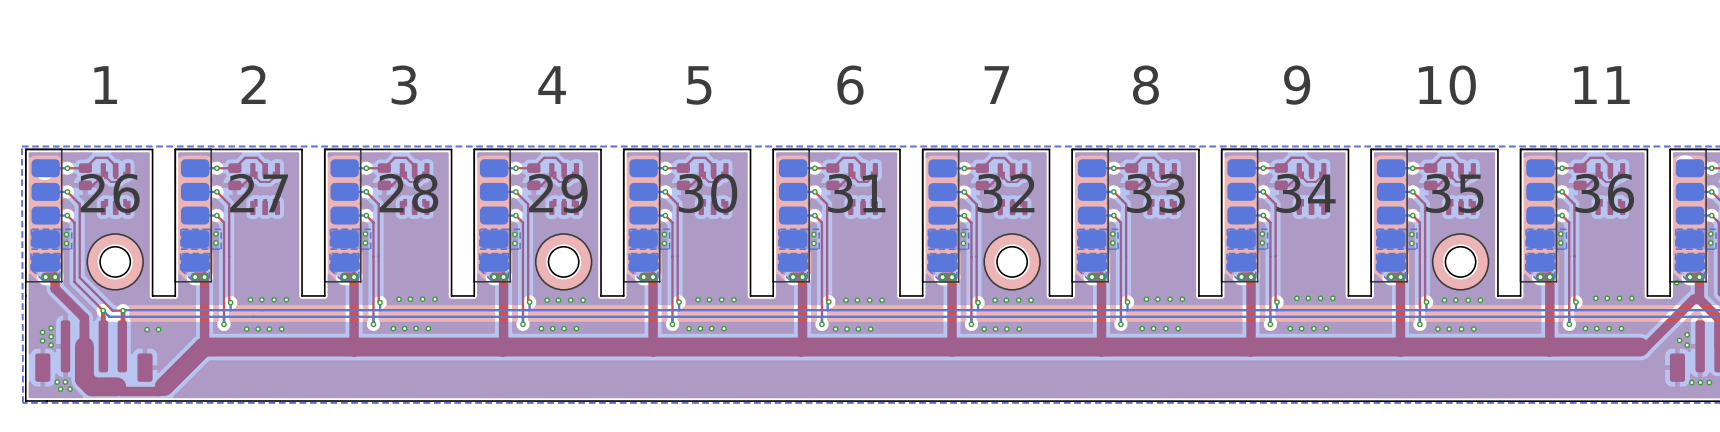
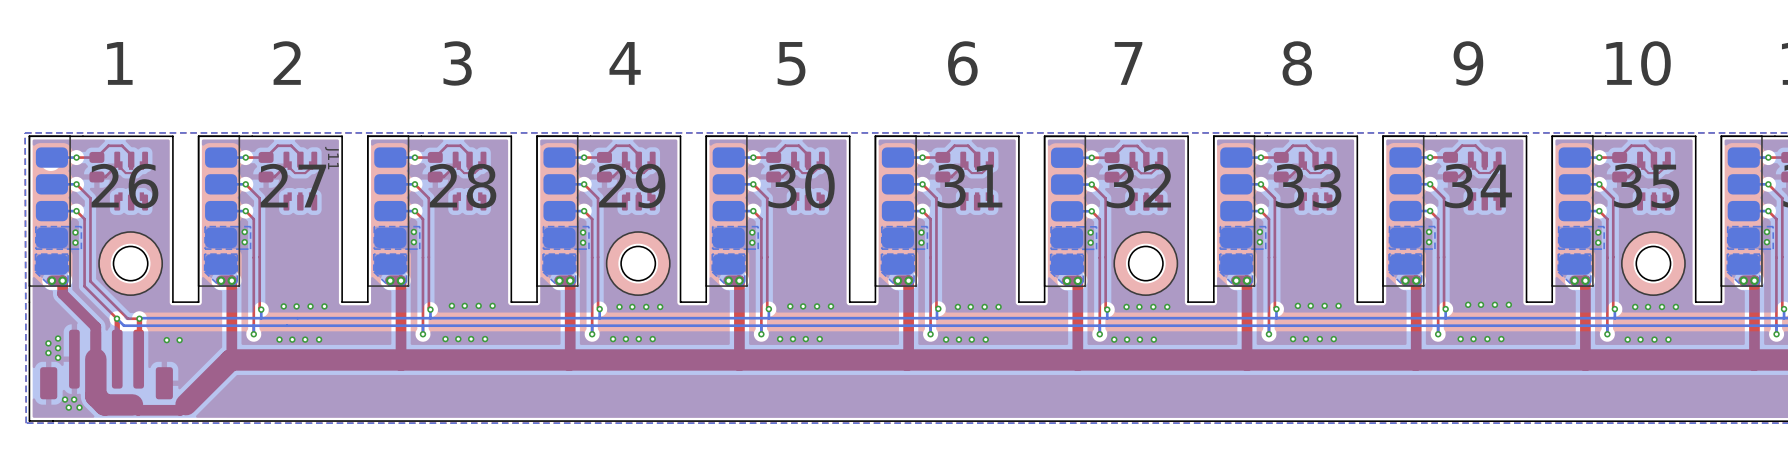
J11 name: none -> J11 (331, 158)

